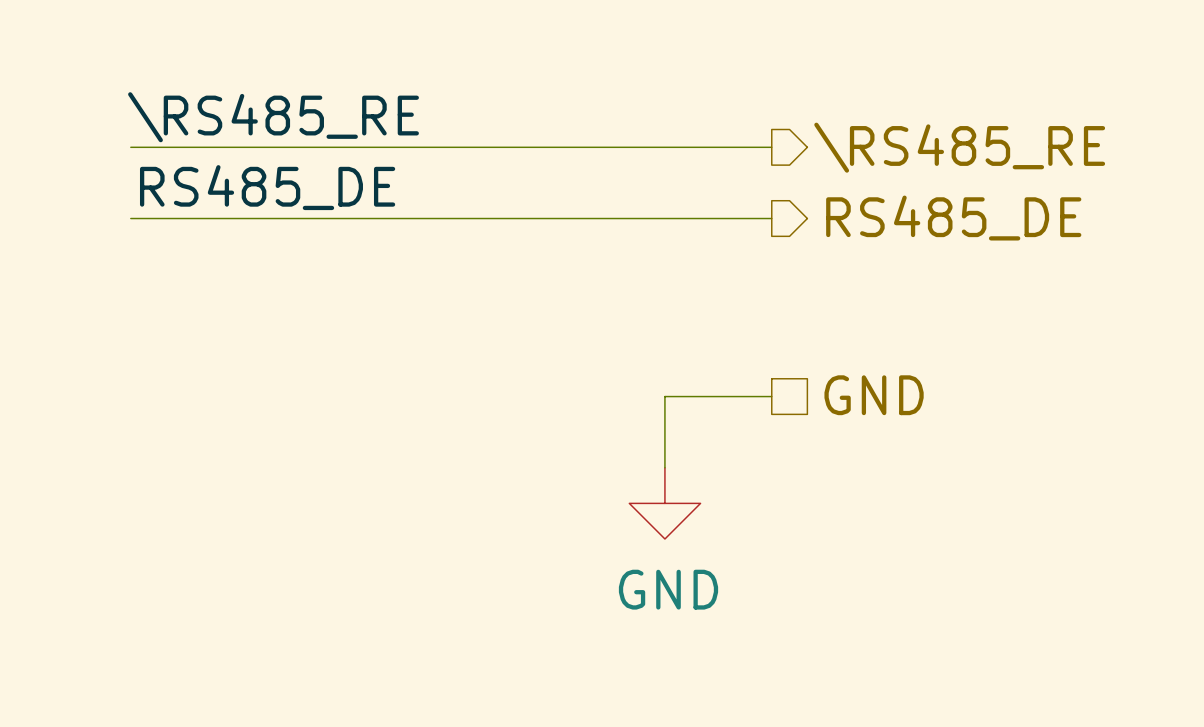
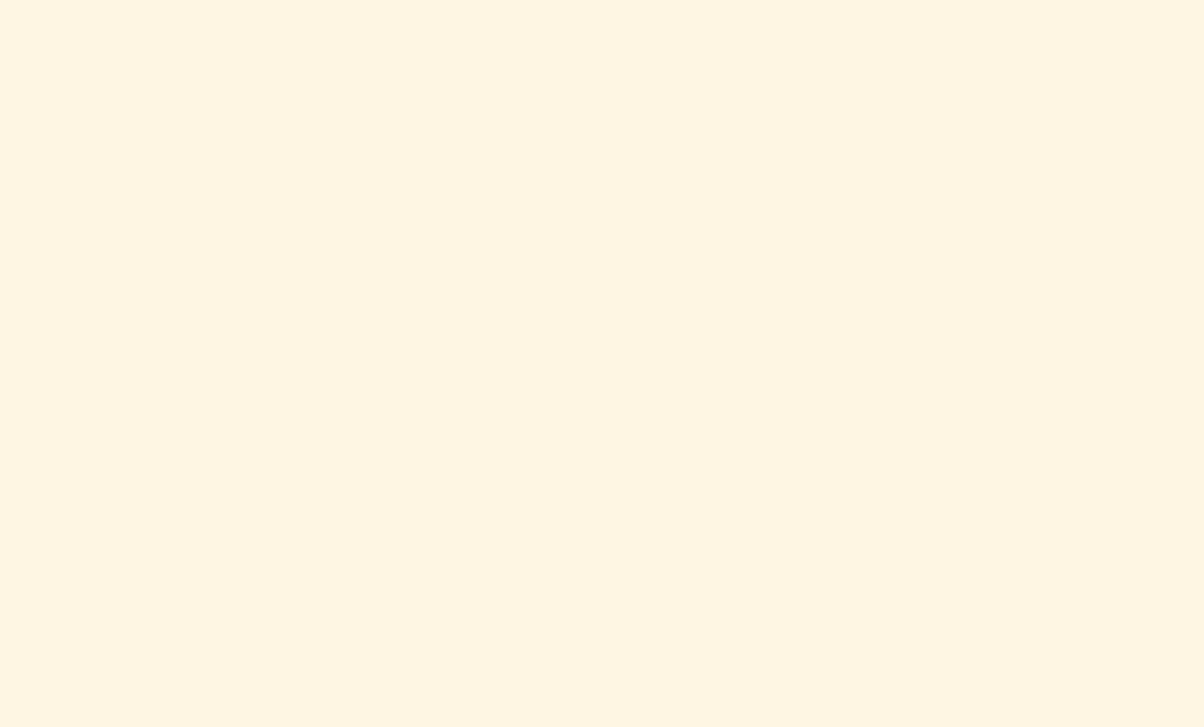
label: \RS485_RE (273, 117) -> none
wire: (130, 147) (771, 147) -> none
hierarchical label: \RS485_RE (959, 147) -> none
label: RS485_DE (267, 187) -> none
wire: (130, 218) (771, 218) -> none
hierarchical label: RS485_DE (953, 218) -> none
hierarchical label: GND (874, 395) -> none
wire: (771, 396) (664, 396) (664, 467) -> none
power symbol: GND (664, 503) -> none

